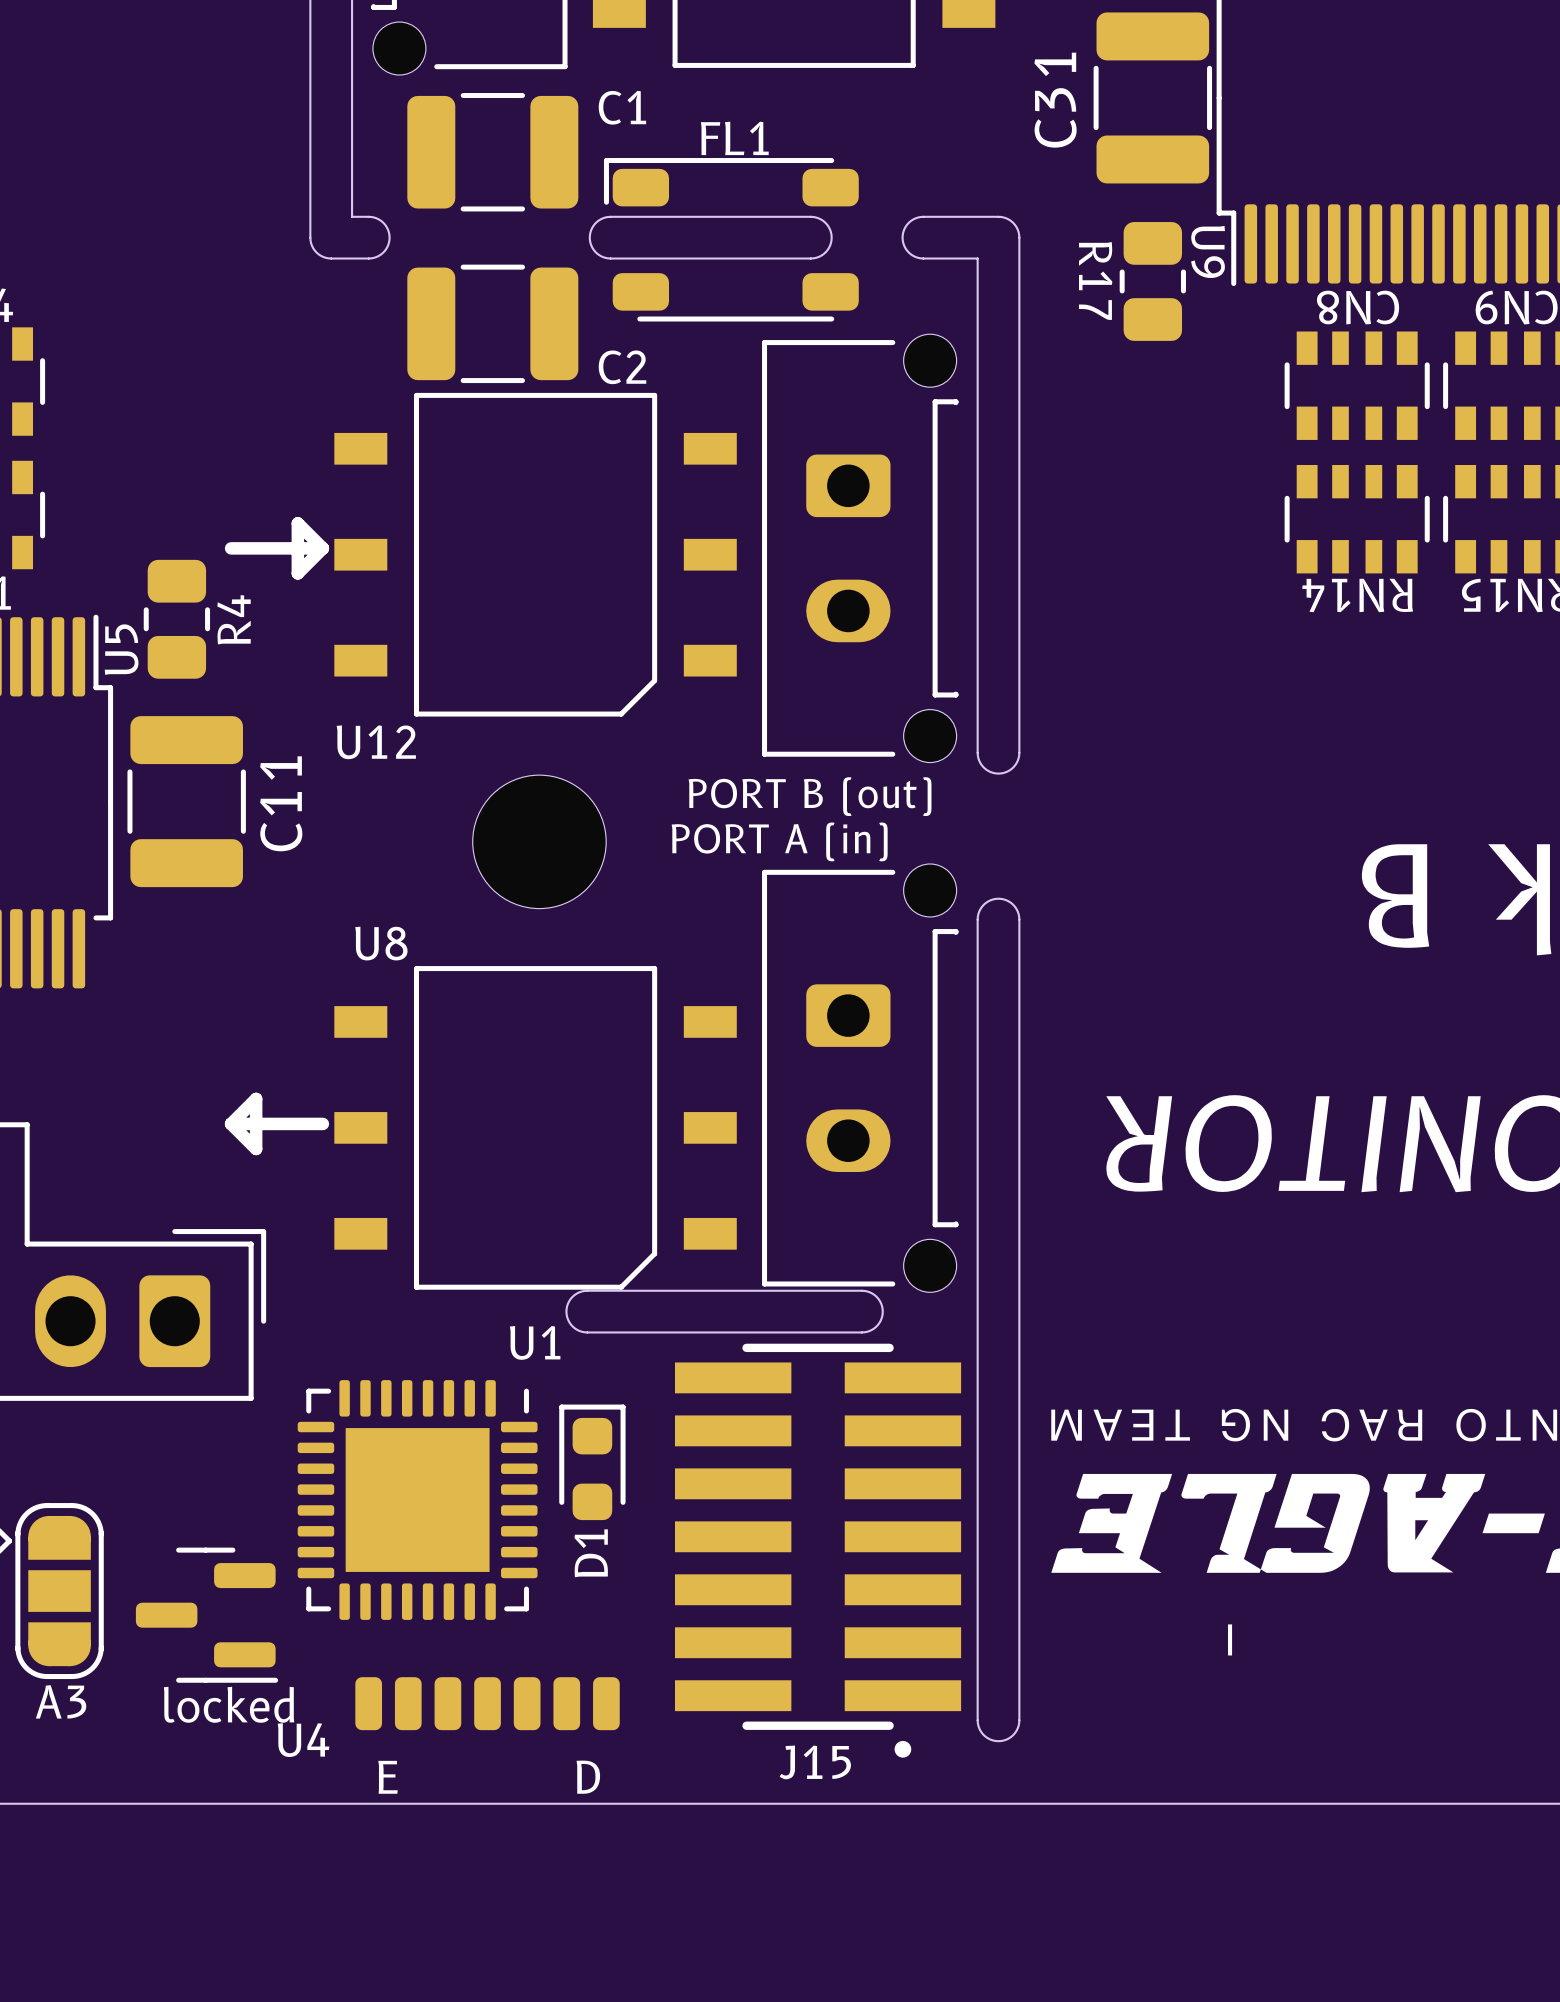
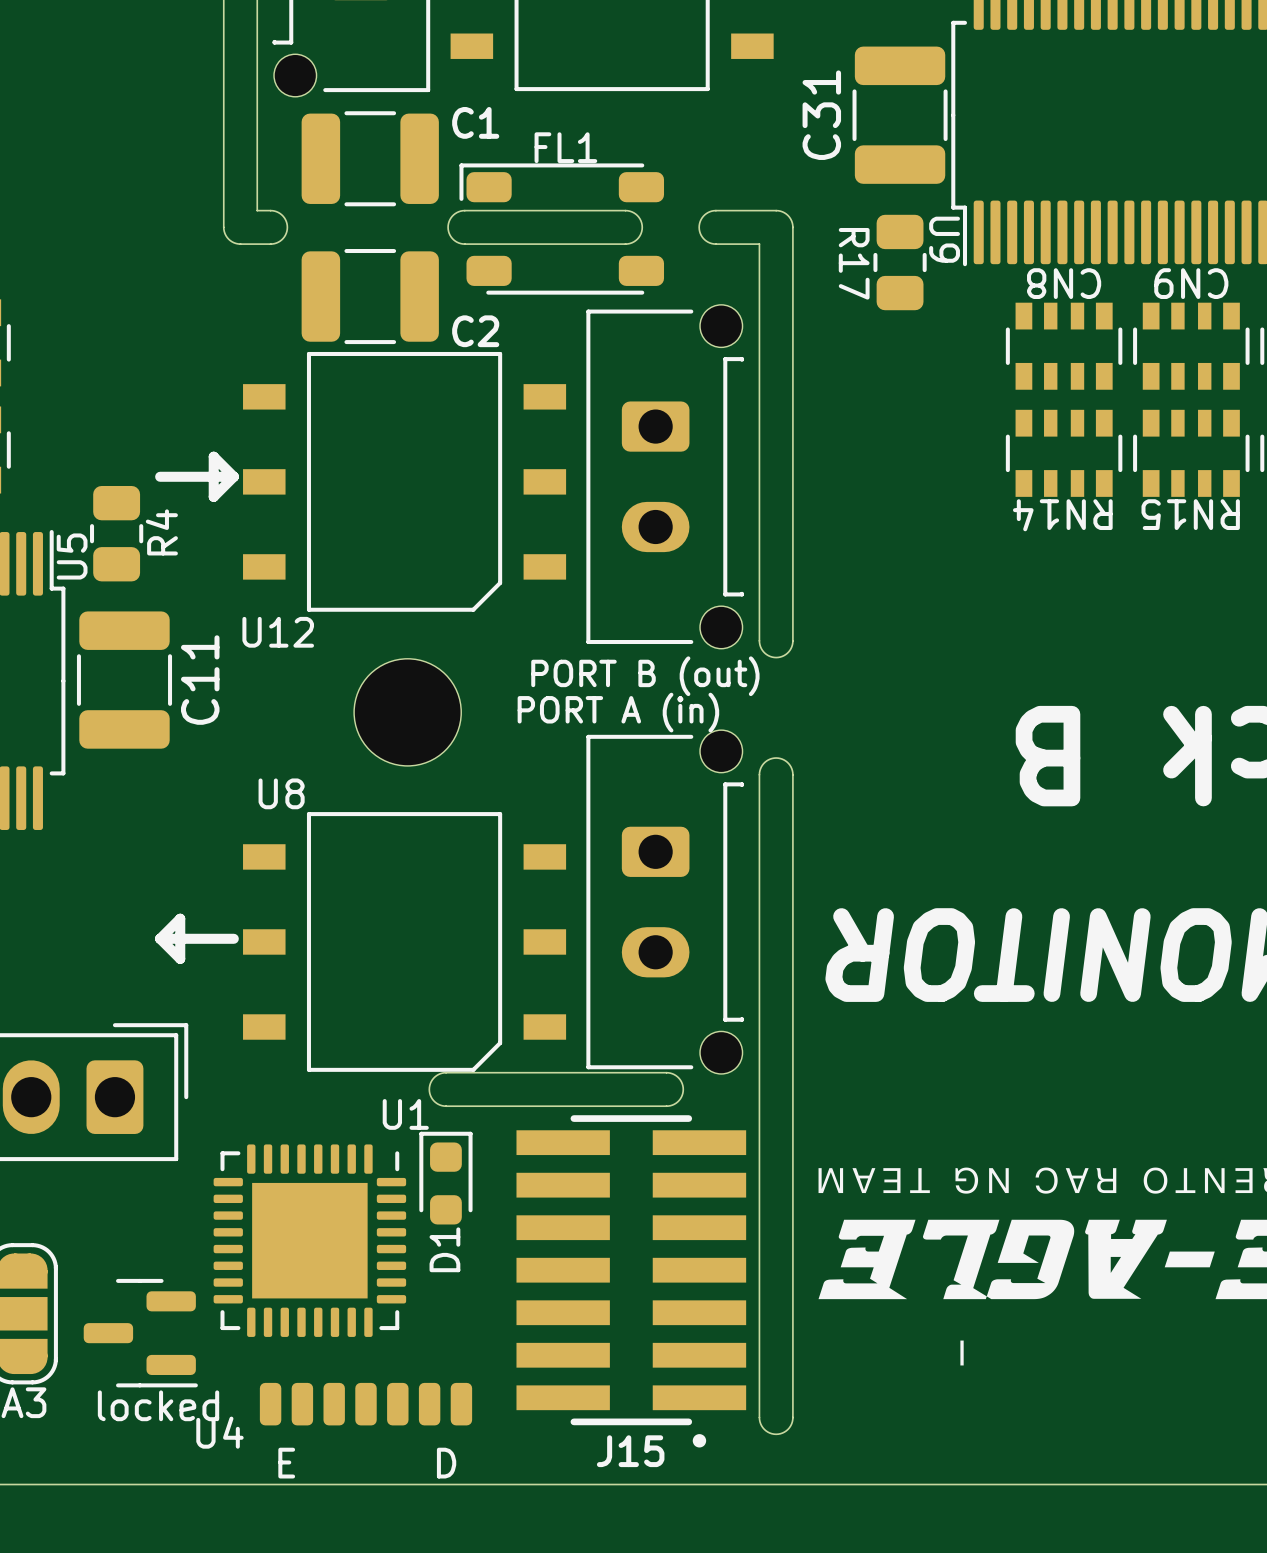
D1 position: (592, 1462) -> (445, 1178)

